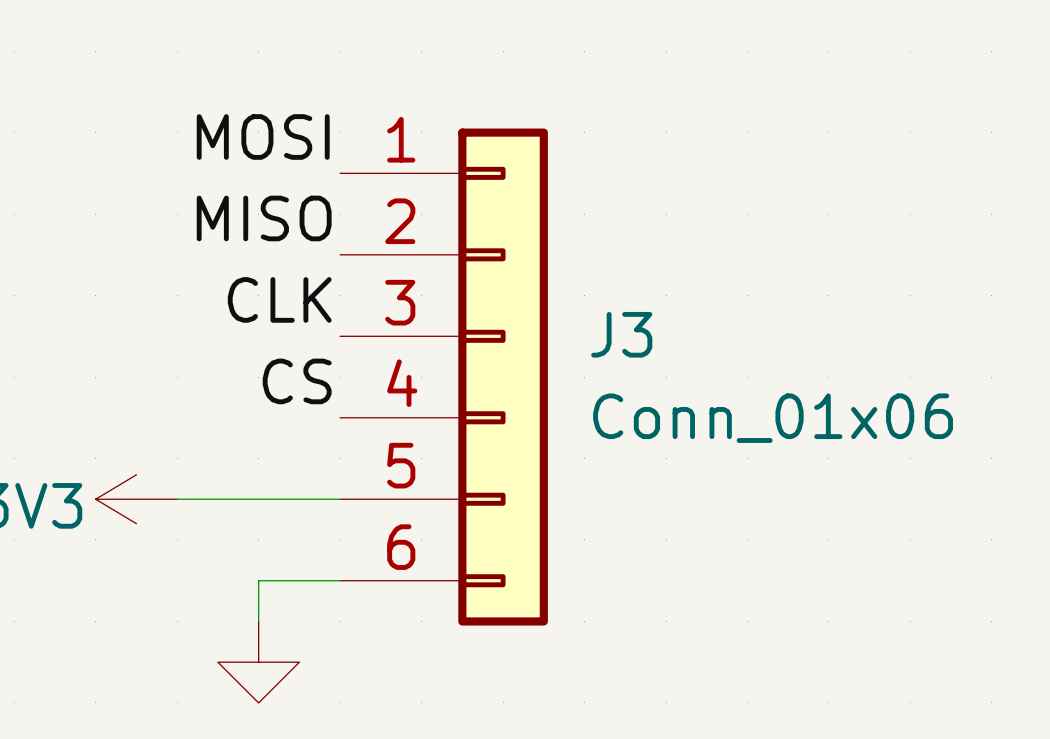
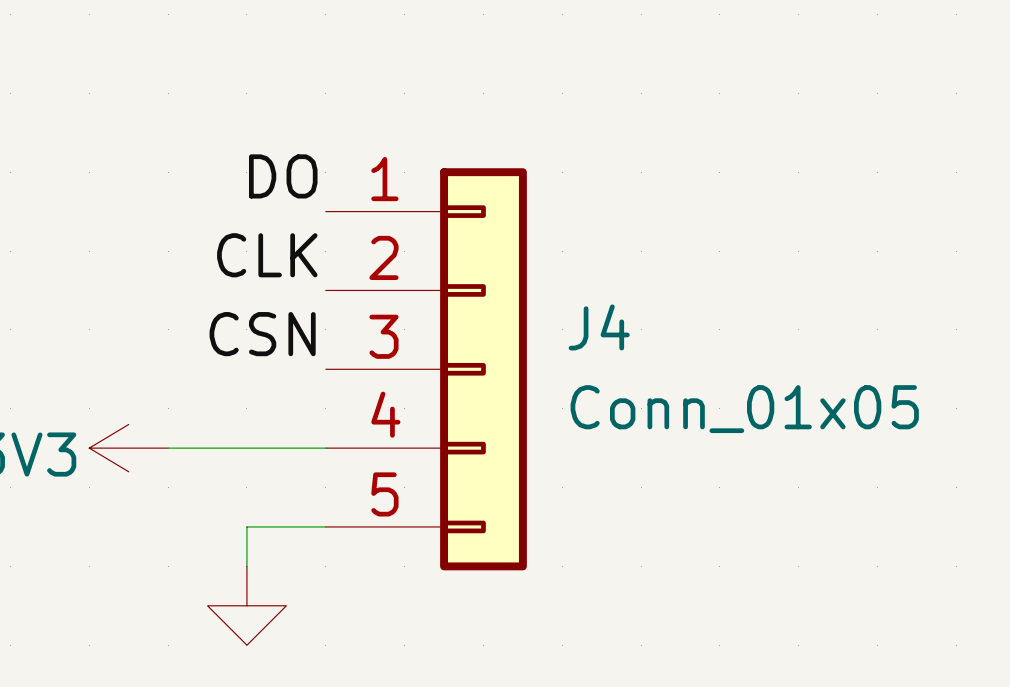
label: MOSI (263, 136) -> none
label: MISO (264, 218) -> DO (283, 176)
J3: Conn_01x06 (444, 377) -> none
label: CS (297, 381) -> CSN (262, 334)
J4: none -> Conn_01x05 (426, 369)

